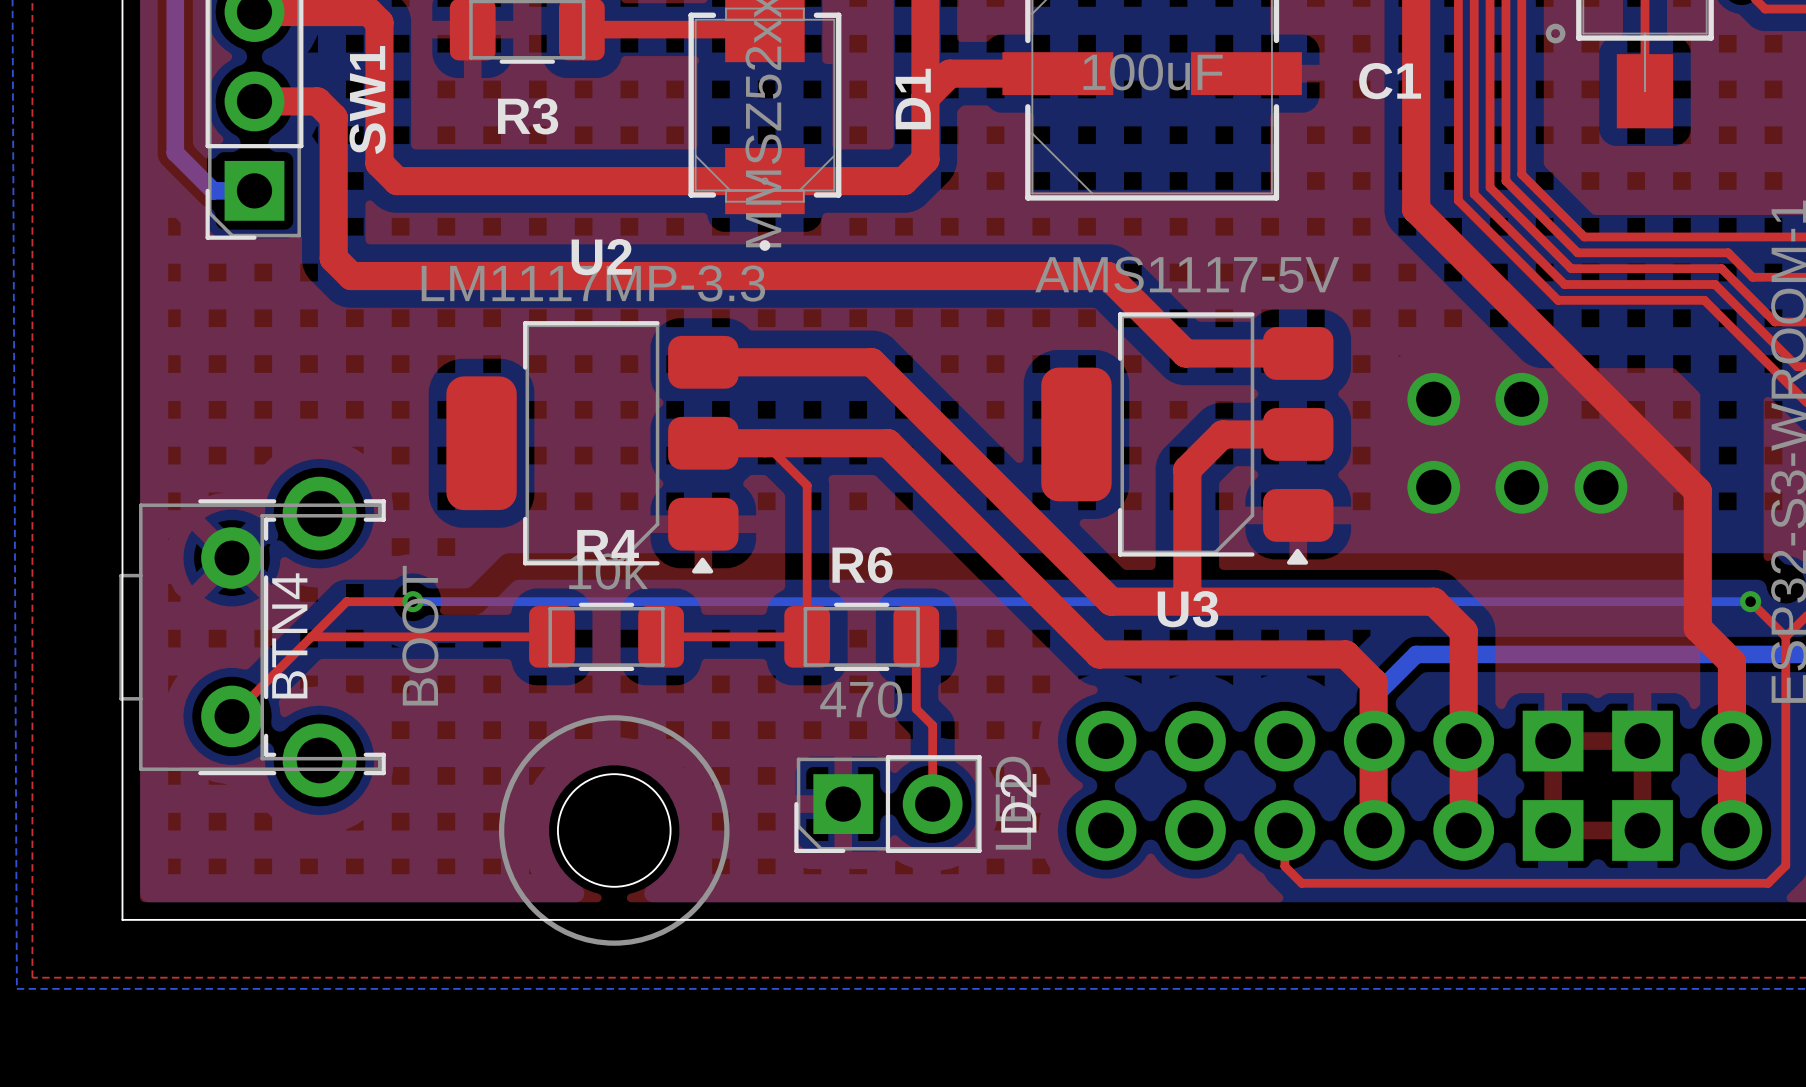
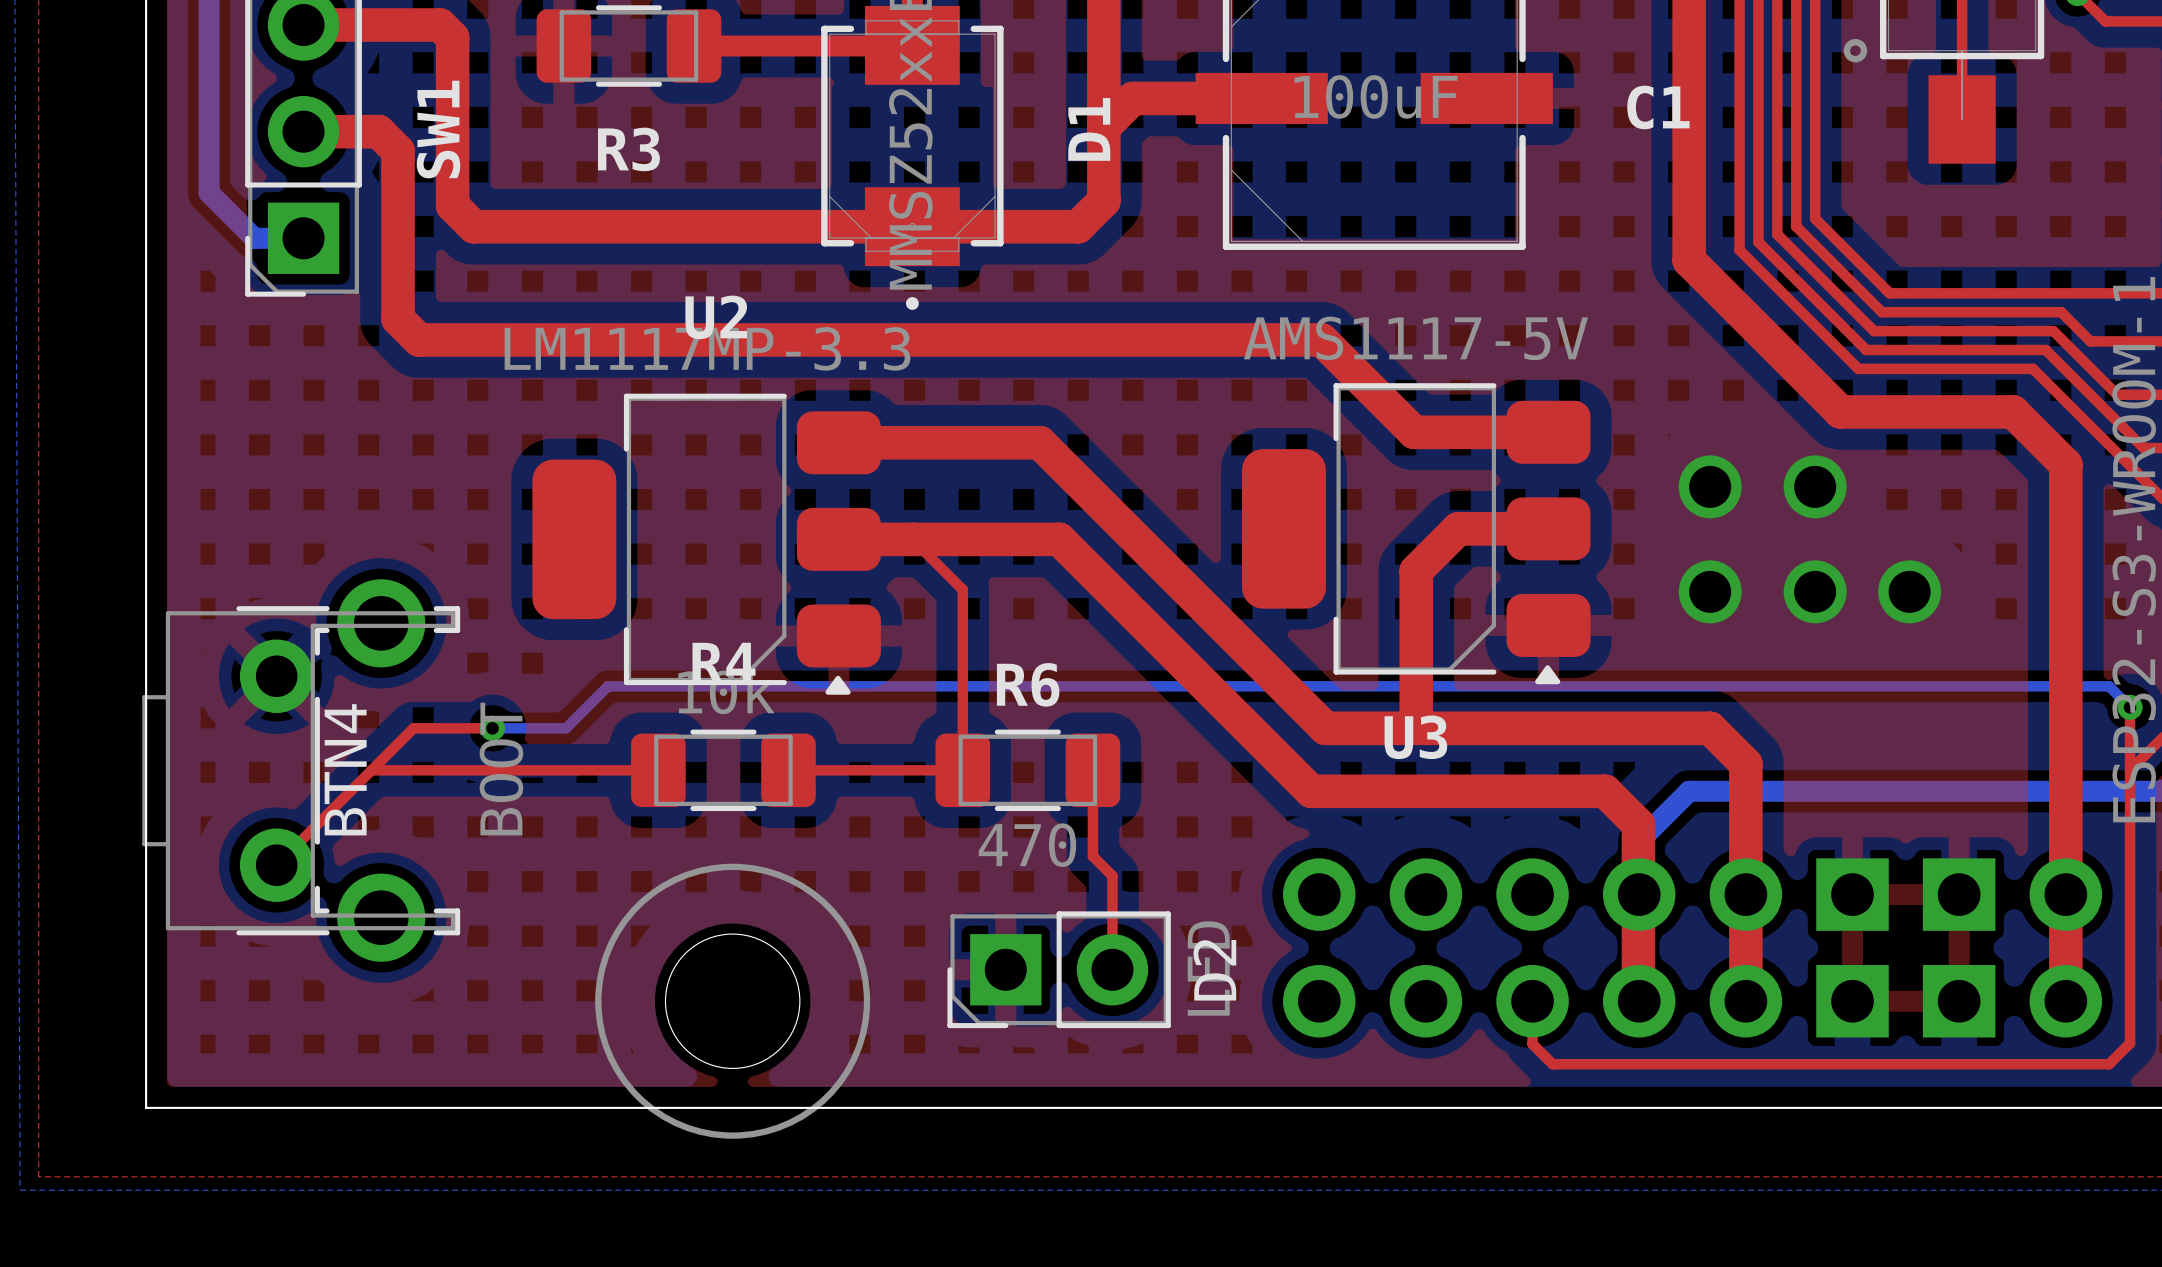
top track: (1543, 336) (1697, 491) (1697, 628) (1731, 662) -> (1840, 411) (2013, 411) (2065, 464) (2065, 800)
bottom track: (474, 601) (1750, 601) -> (565, 728) (607, 686) (2109, 686) (2130, 707)
top track: (1750, 601) (1785, 636) -> (2130, 707) (2130, 770)
via position: (1750, 601) -> (2130, 707)

